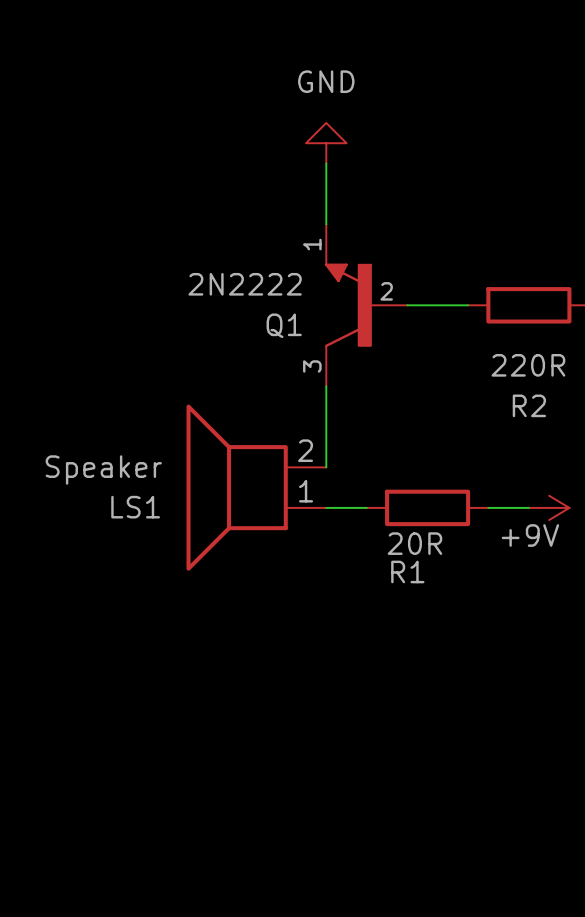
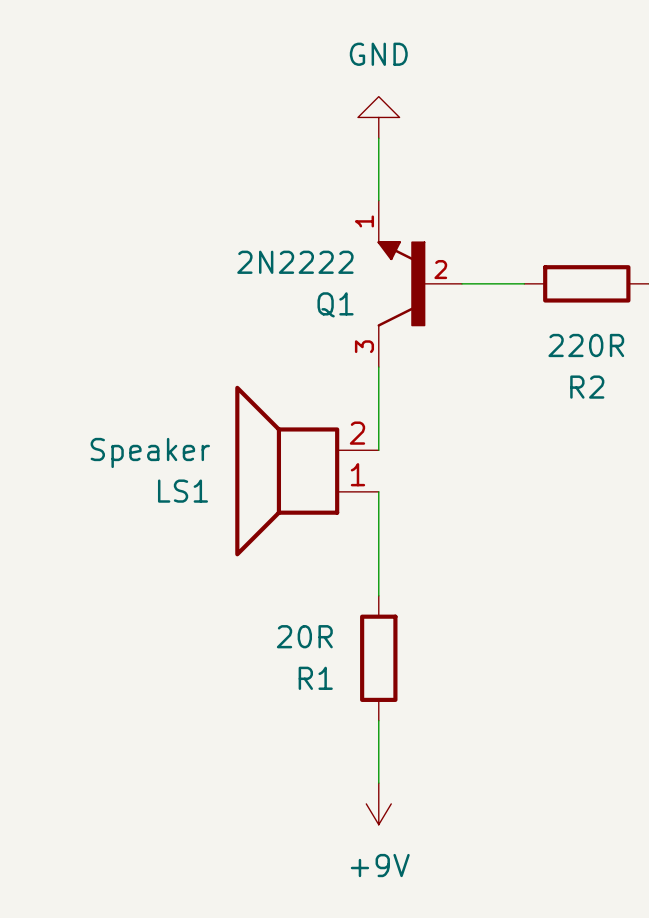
wire: (326, 507) (366, 507) -> (378, 491) (378, 595)
R1 rotation: 0° (427, 507) -> 90° clockwise (378, 658)
R1 position: (427, 507) -> (378, 658)
wire: (488, 507) (528, 507) -> none
power symbol rotation: 0° (549, 507) -> 90° clockwise (378, 803)
power symbol position: +9V (549, 507) -> +9V (378, 803)
power symbol text position: +9V (530, 535) -> +9V (380, 865)
R1 value position: 20R (414, 543) -> 20R (304, 636)
R1 name position: R1 (407, 571) -> R1 (315, 678)
wire: none -> (378, 720) (378, 783)

